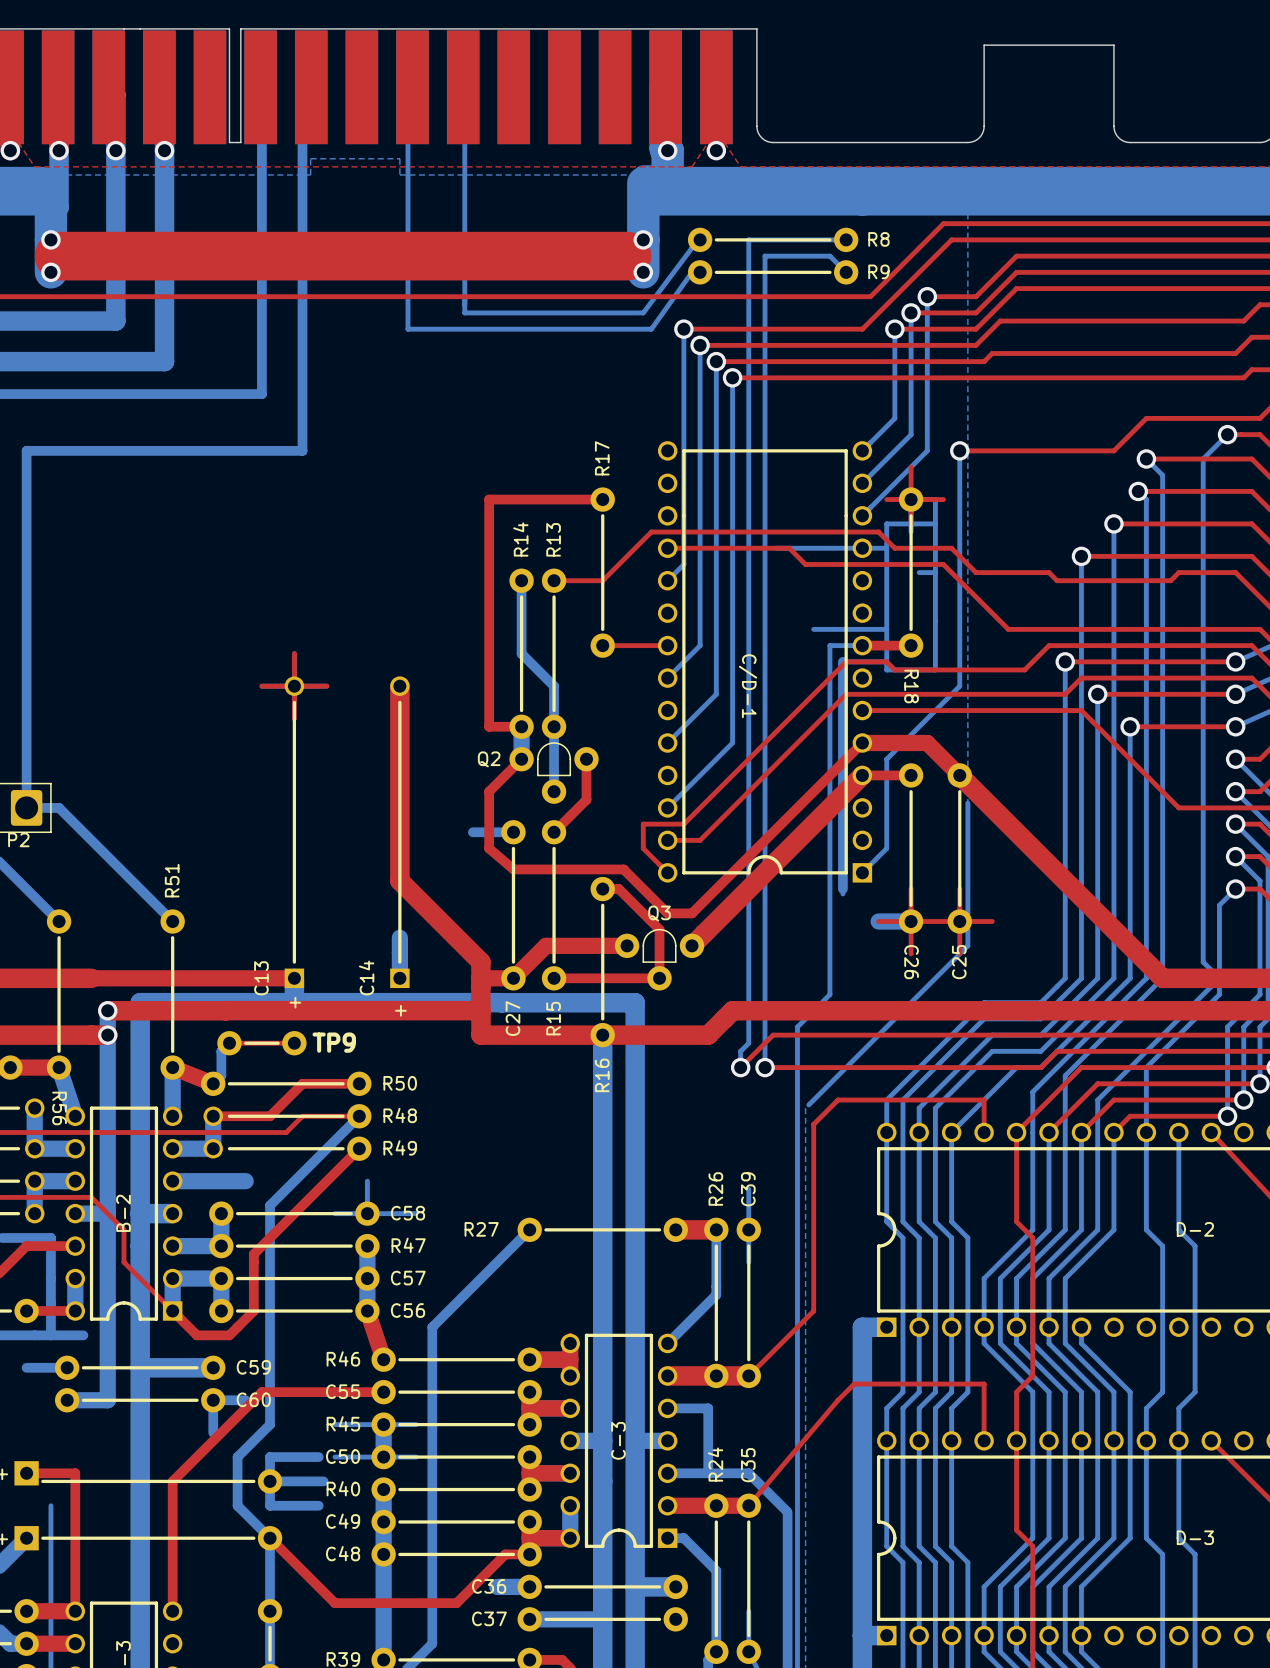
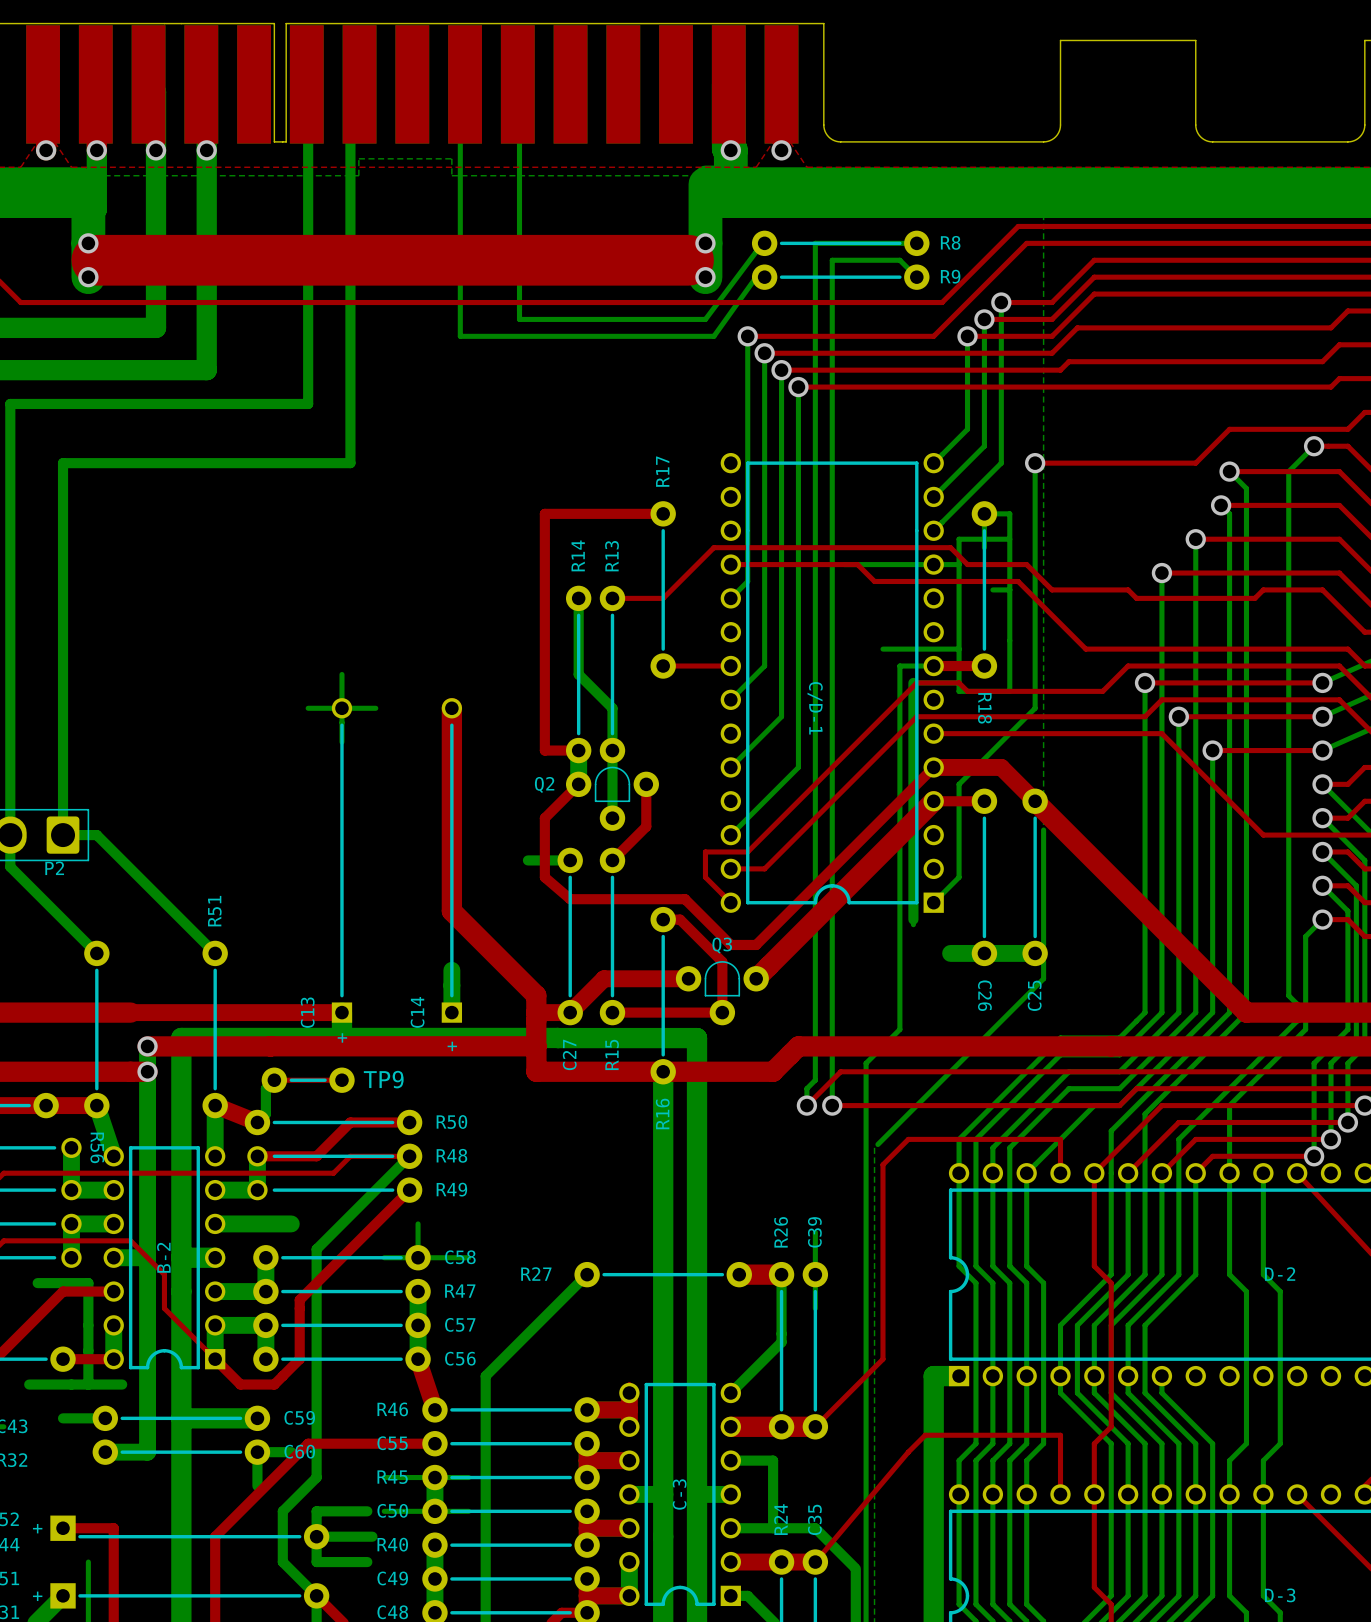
top track: (911, 467) (911, 523) -> none
top track: (886, 499) (943, 499) -> none
top track: (294, 653) (294, 718) -> none
top track: (261, 686) (326, 686) -> none
top track: (911, 889) (911, 953) -> none
top track: (959, 889) (959, 953) -> none
top track: (878, 921) (992, 921) -> none
bottom track: none -> (984, 953) (1035, 953)

